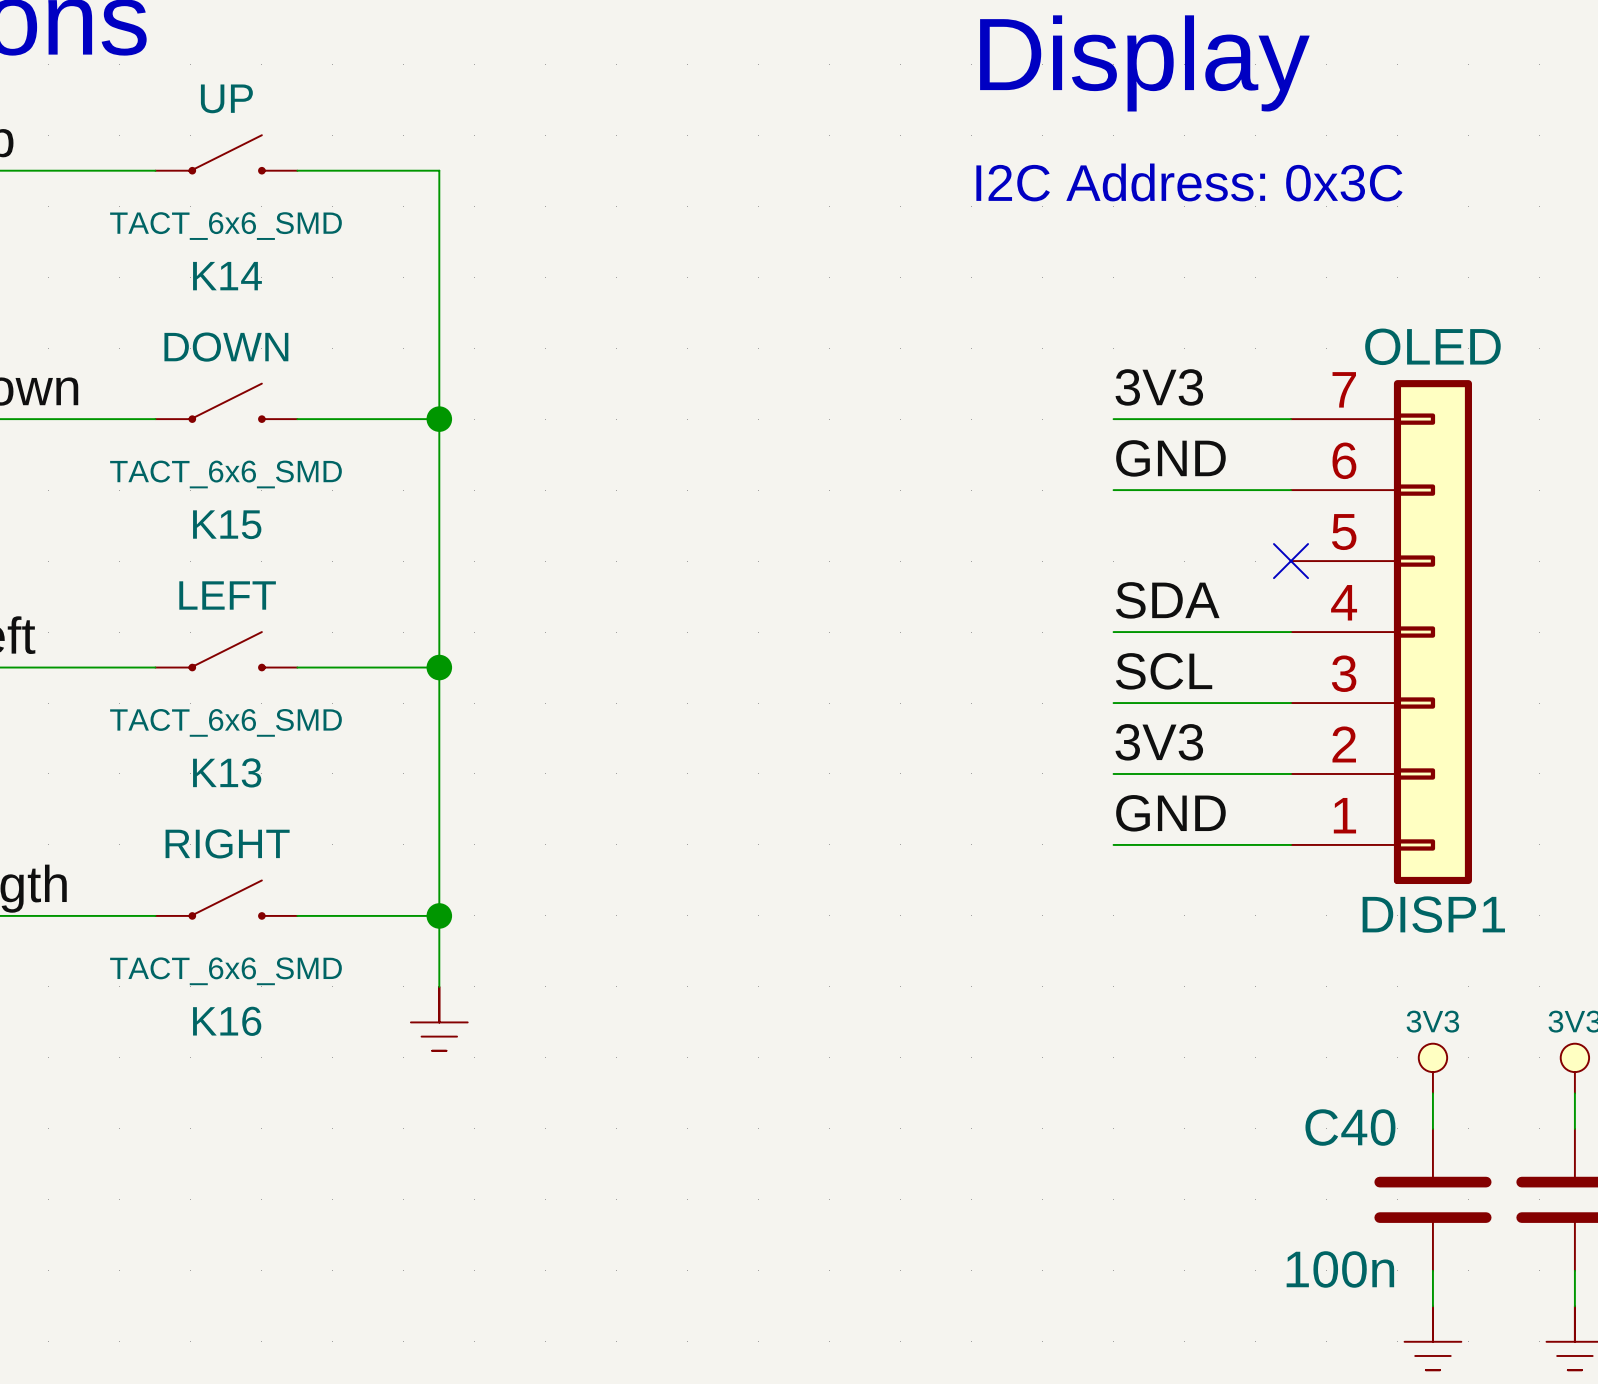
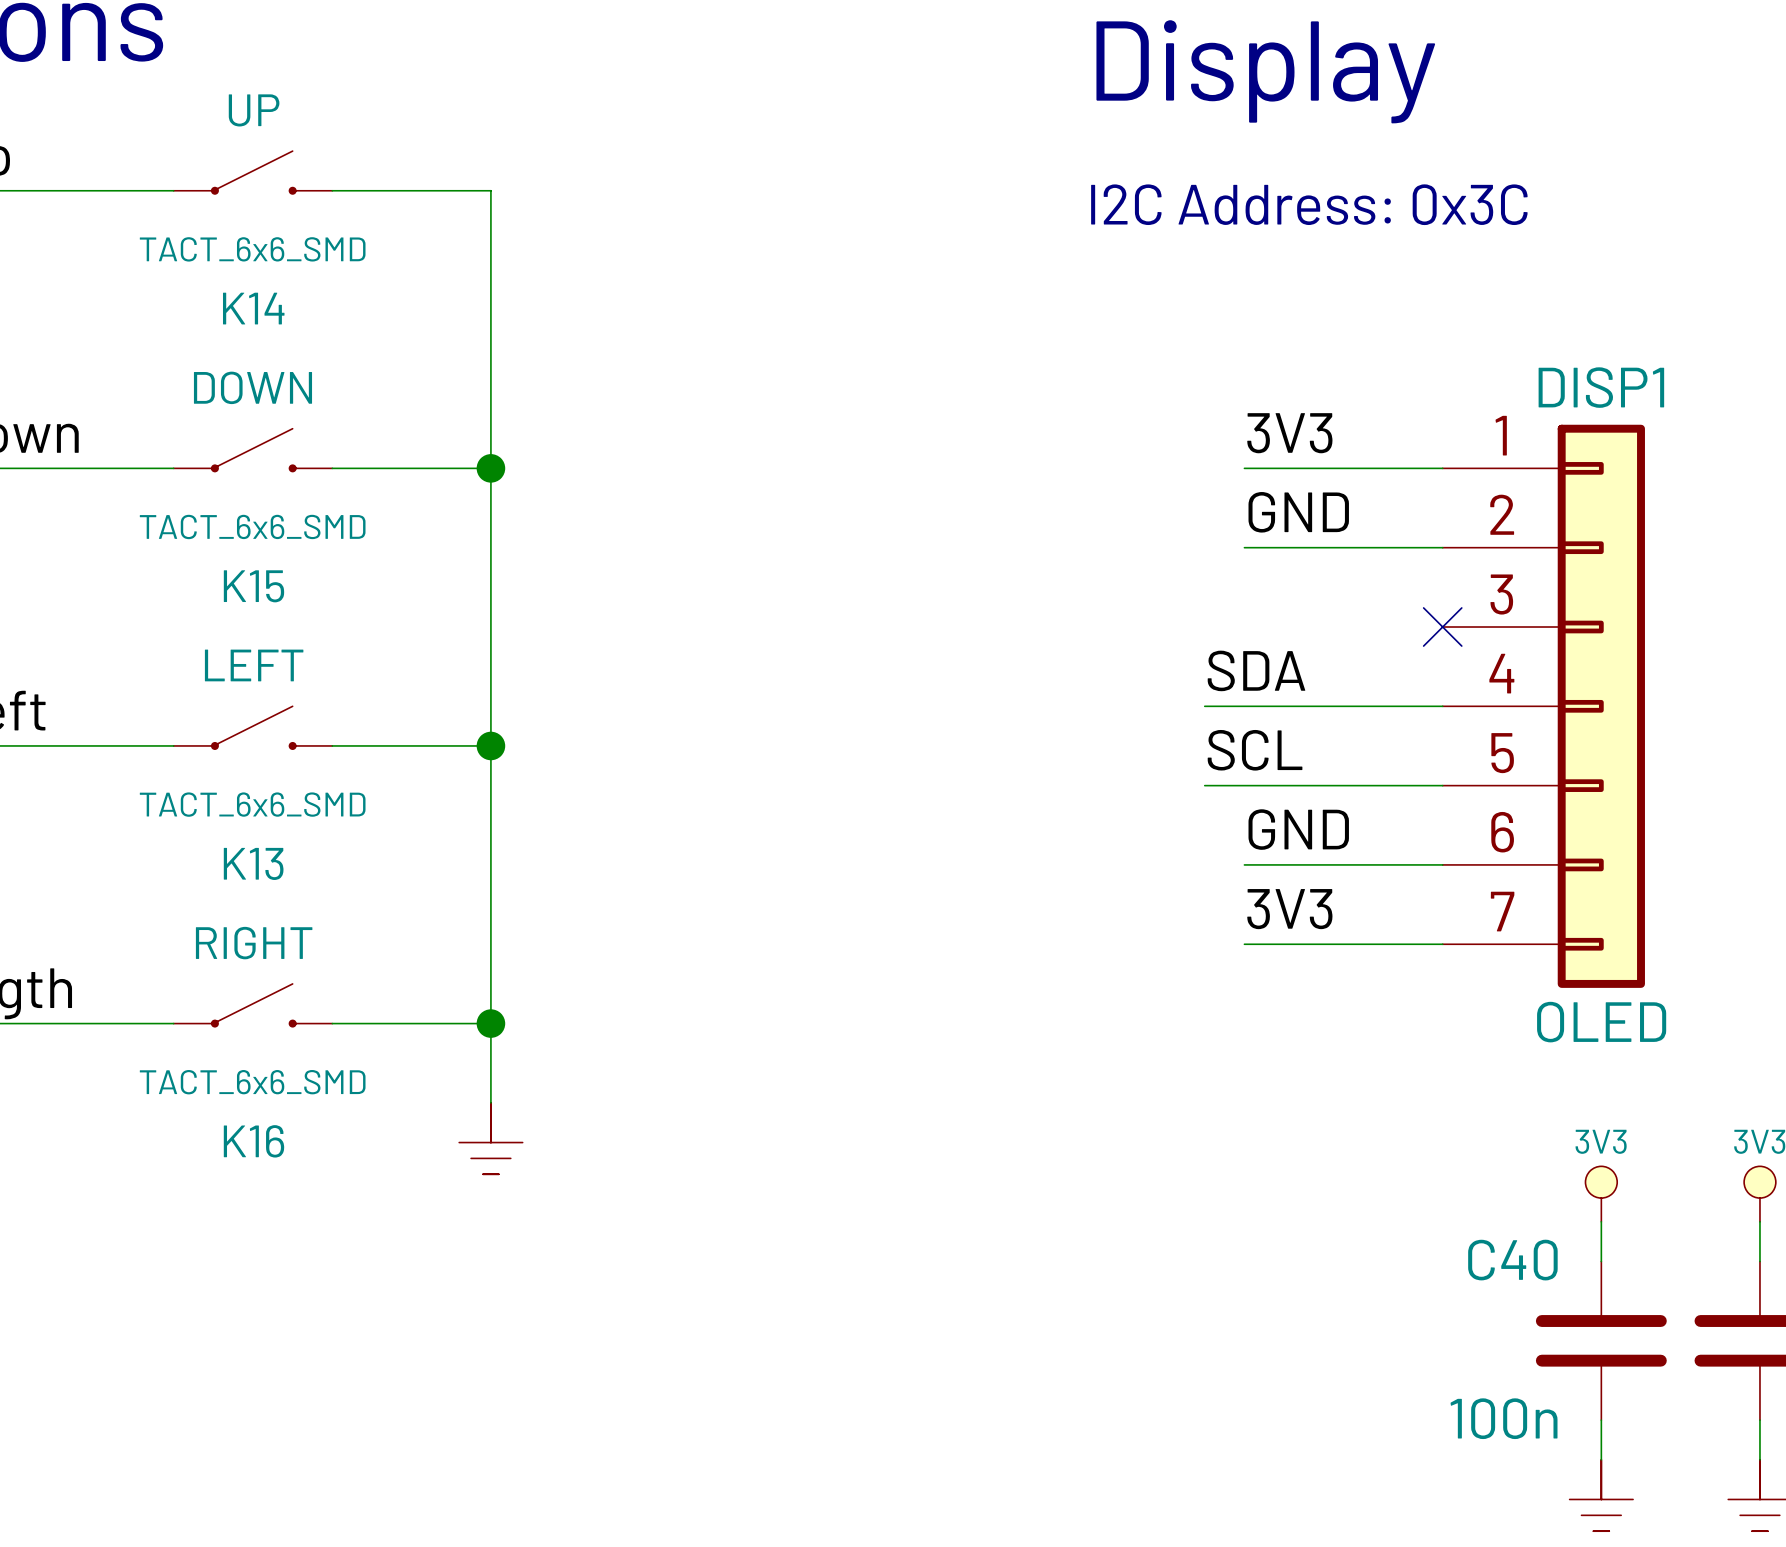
label position: SDA (1167, 600) -> SDA (1256, 670)
wire: none -> (1204, 706) (1244, 706)
DISP1 flip: as is (1432, 632) -> up-down (1601, 706)
label position: SCL (1164, 671) -> SCL (1255, 750)
wire: none -> (1204, 785) (1244, 785)
label: 3V3 (1159, 742) -> GND (1298, 829)
label: GND (1170, 813) -> 3V3 (1289, 909)

